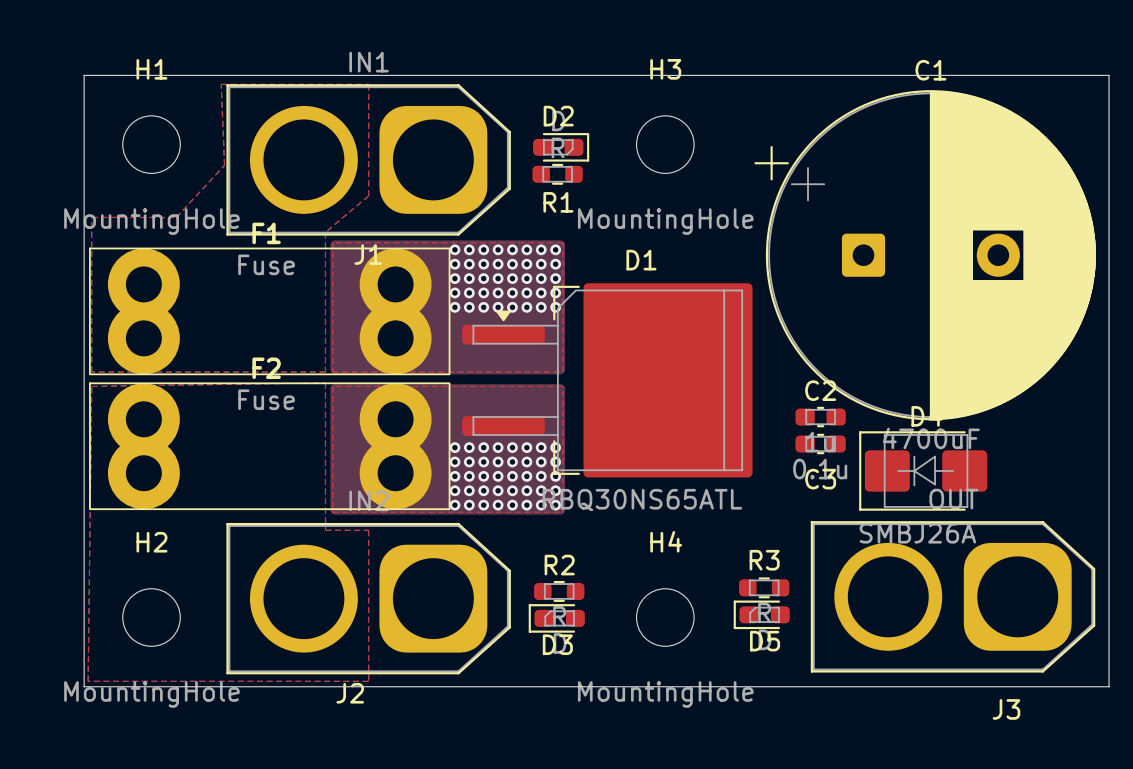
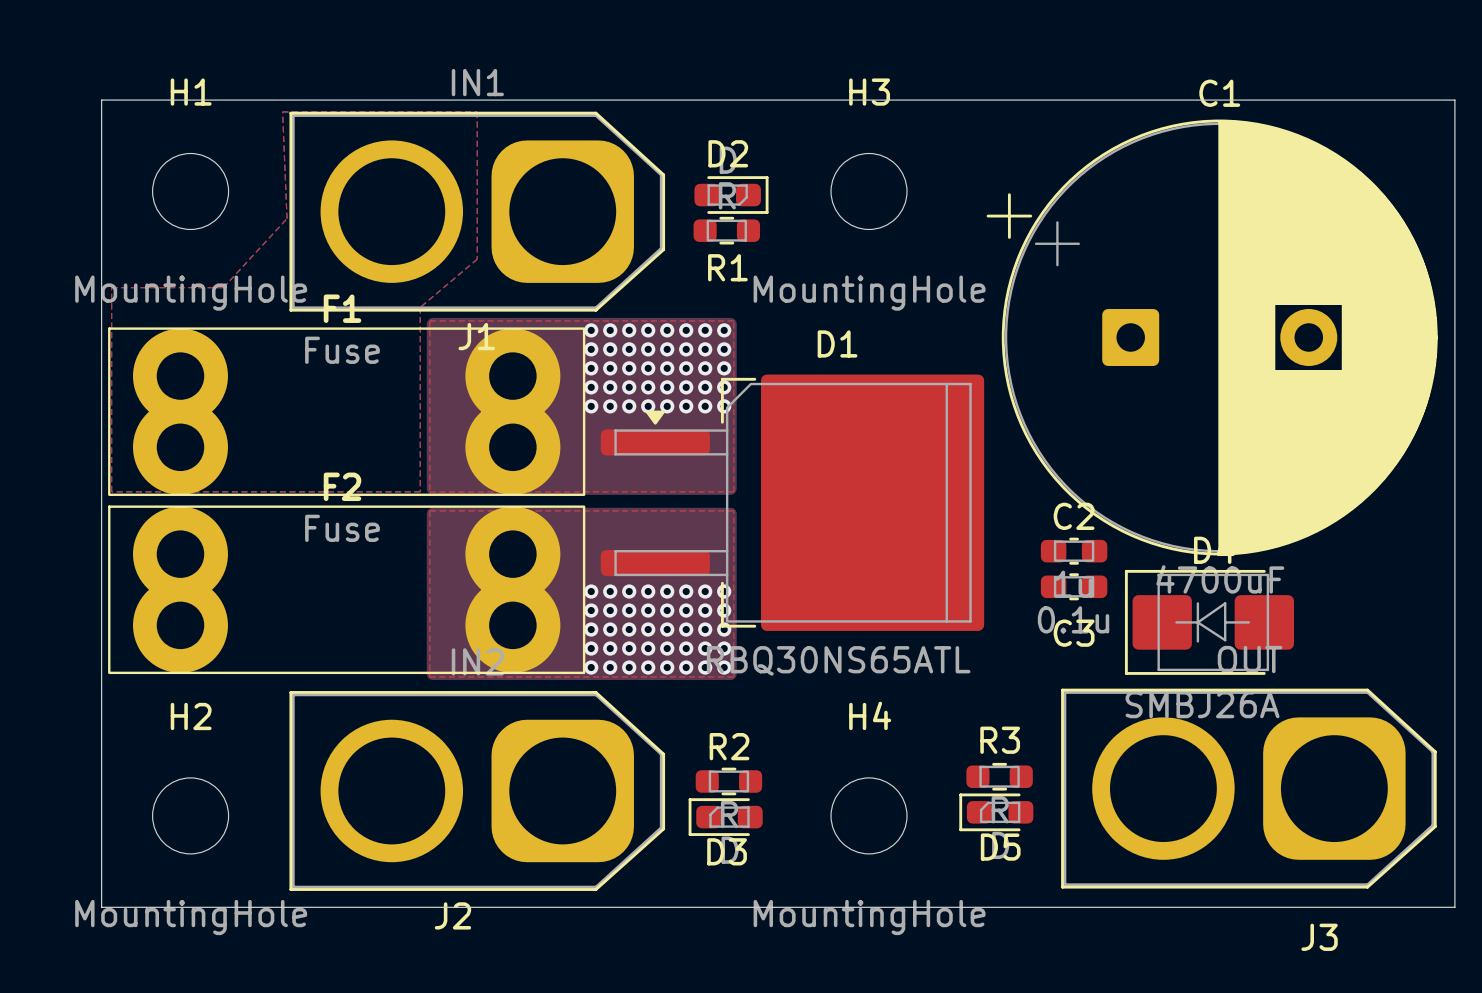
top zone outline: (325, 382) (91, 386) (88, 681) (368, 681) (368, 530) (325, 530) (325, 382) -> none

